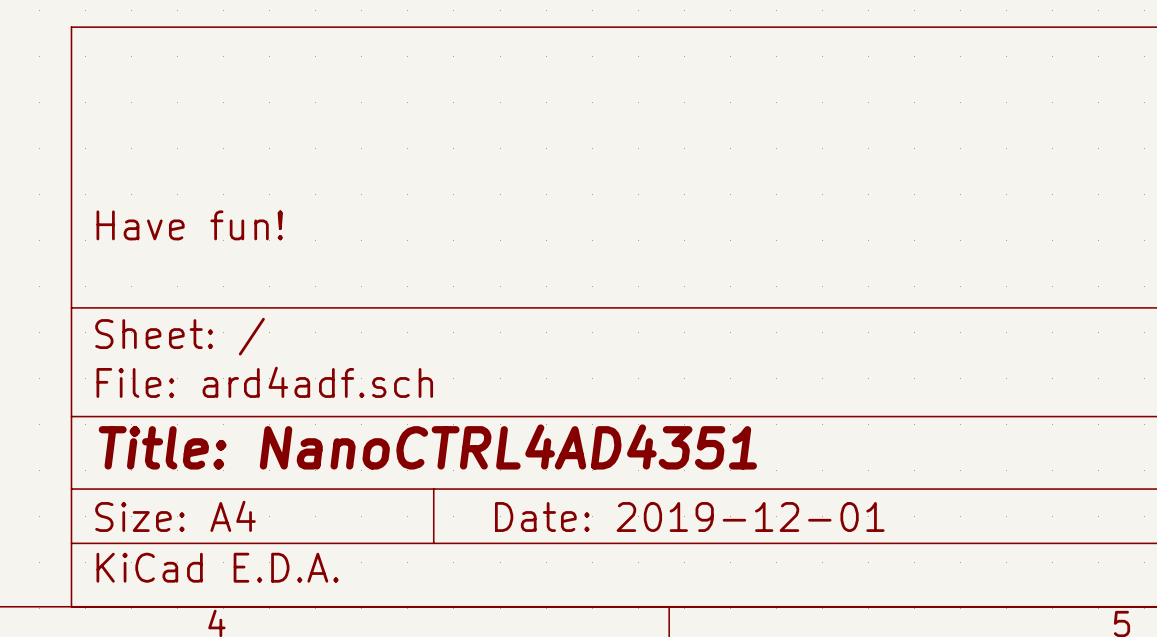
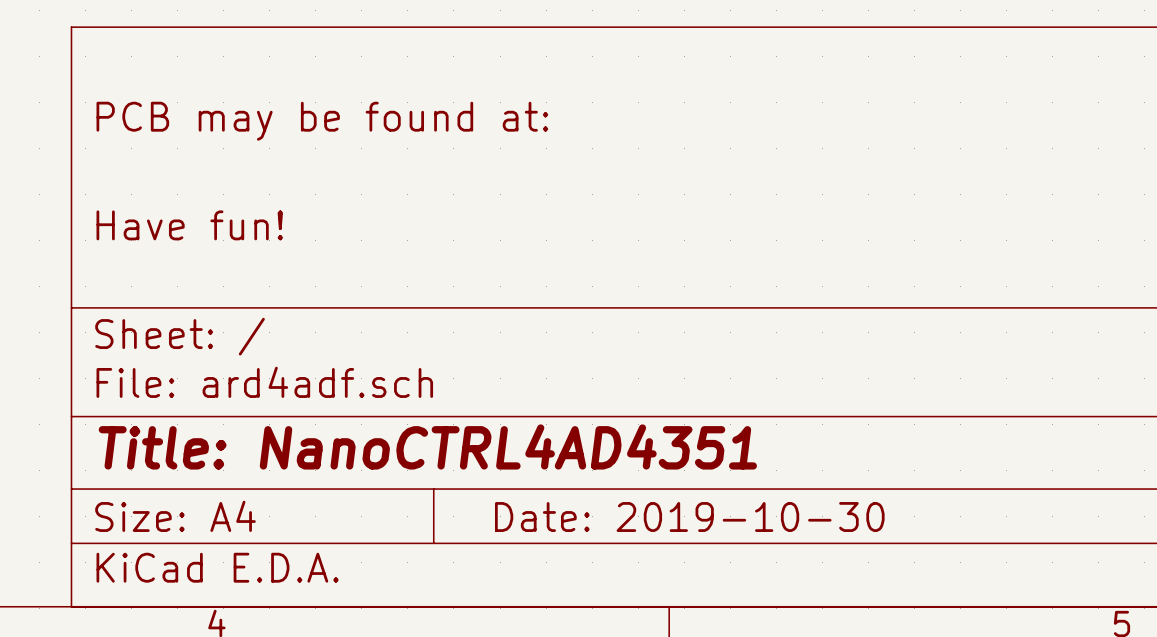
title block: none -> PCB may be found at: (322, 121)
title block: Date: 2019-12-01 (689, 517) -> Date: 2019-10-30 (689, 517)

